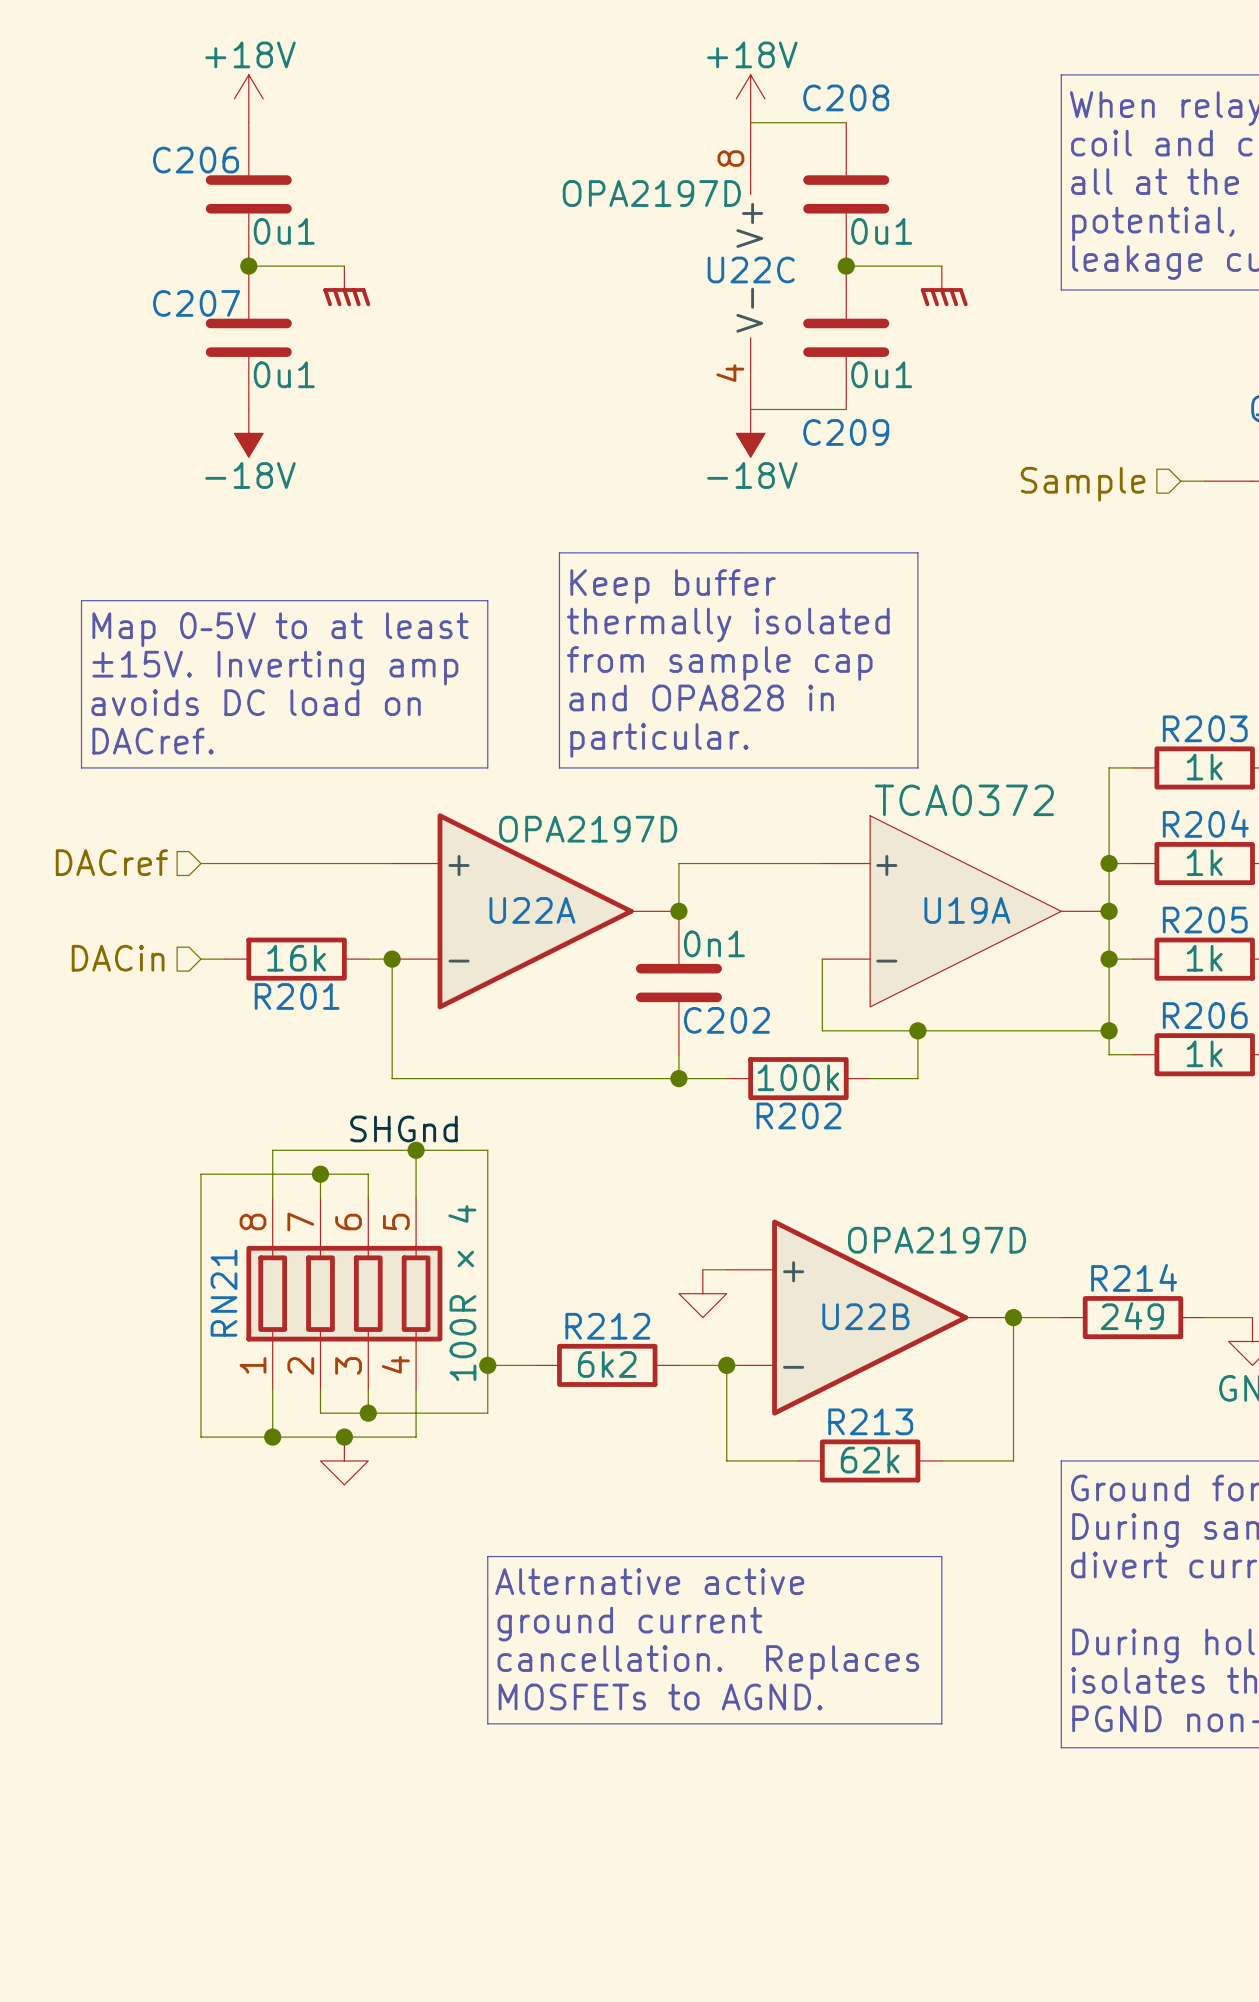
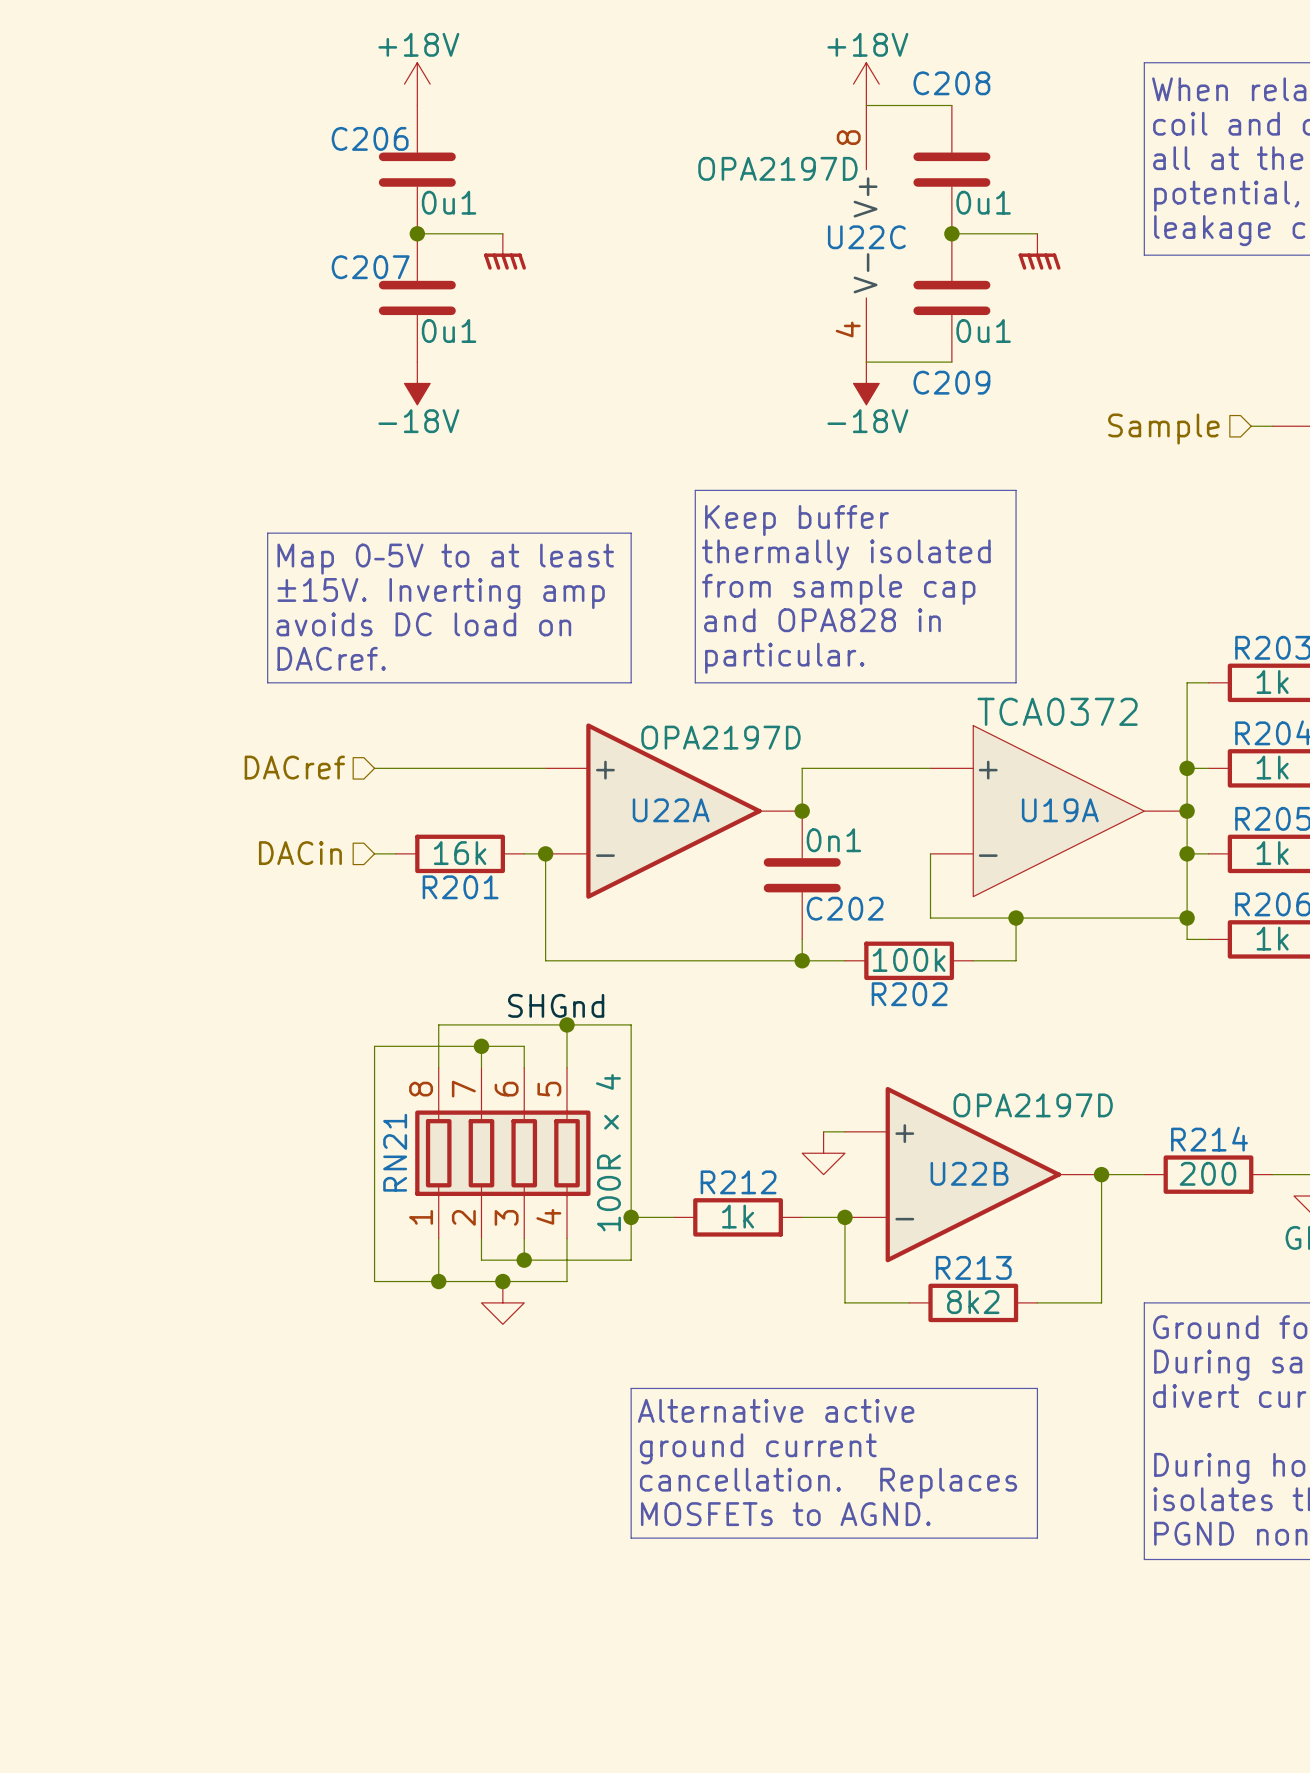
R214 value: 249 (1132, 1316) -> 200 (1207, 1173)
R212 value: 6k2 (607, 1364) -> 1k (738, 1216)
R213 value: 62k (870, 1460) -> 8k2 (973, 1302)

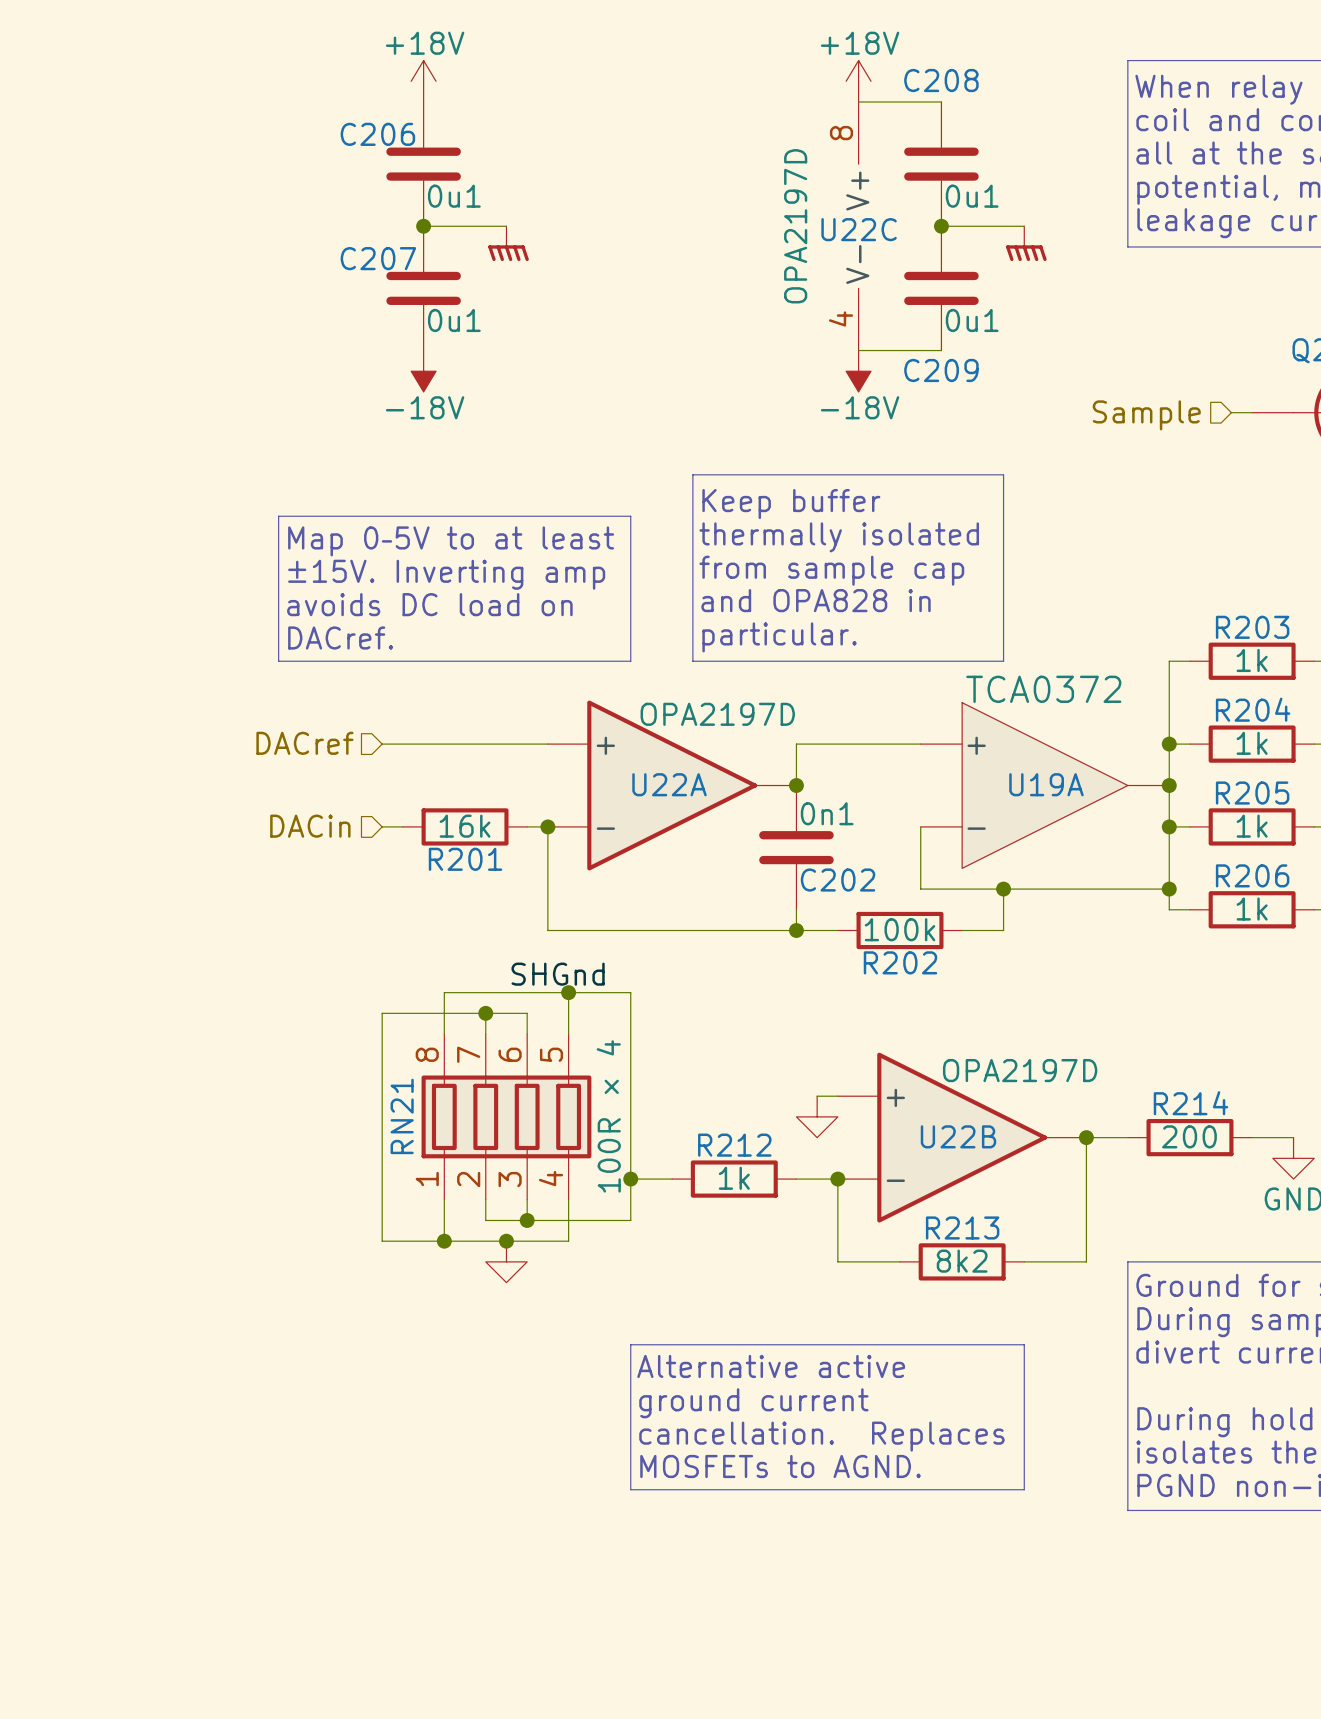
U22C value rotation: 0° (777, 168) -> 90° counterclockwise (795, 226)

